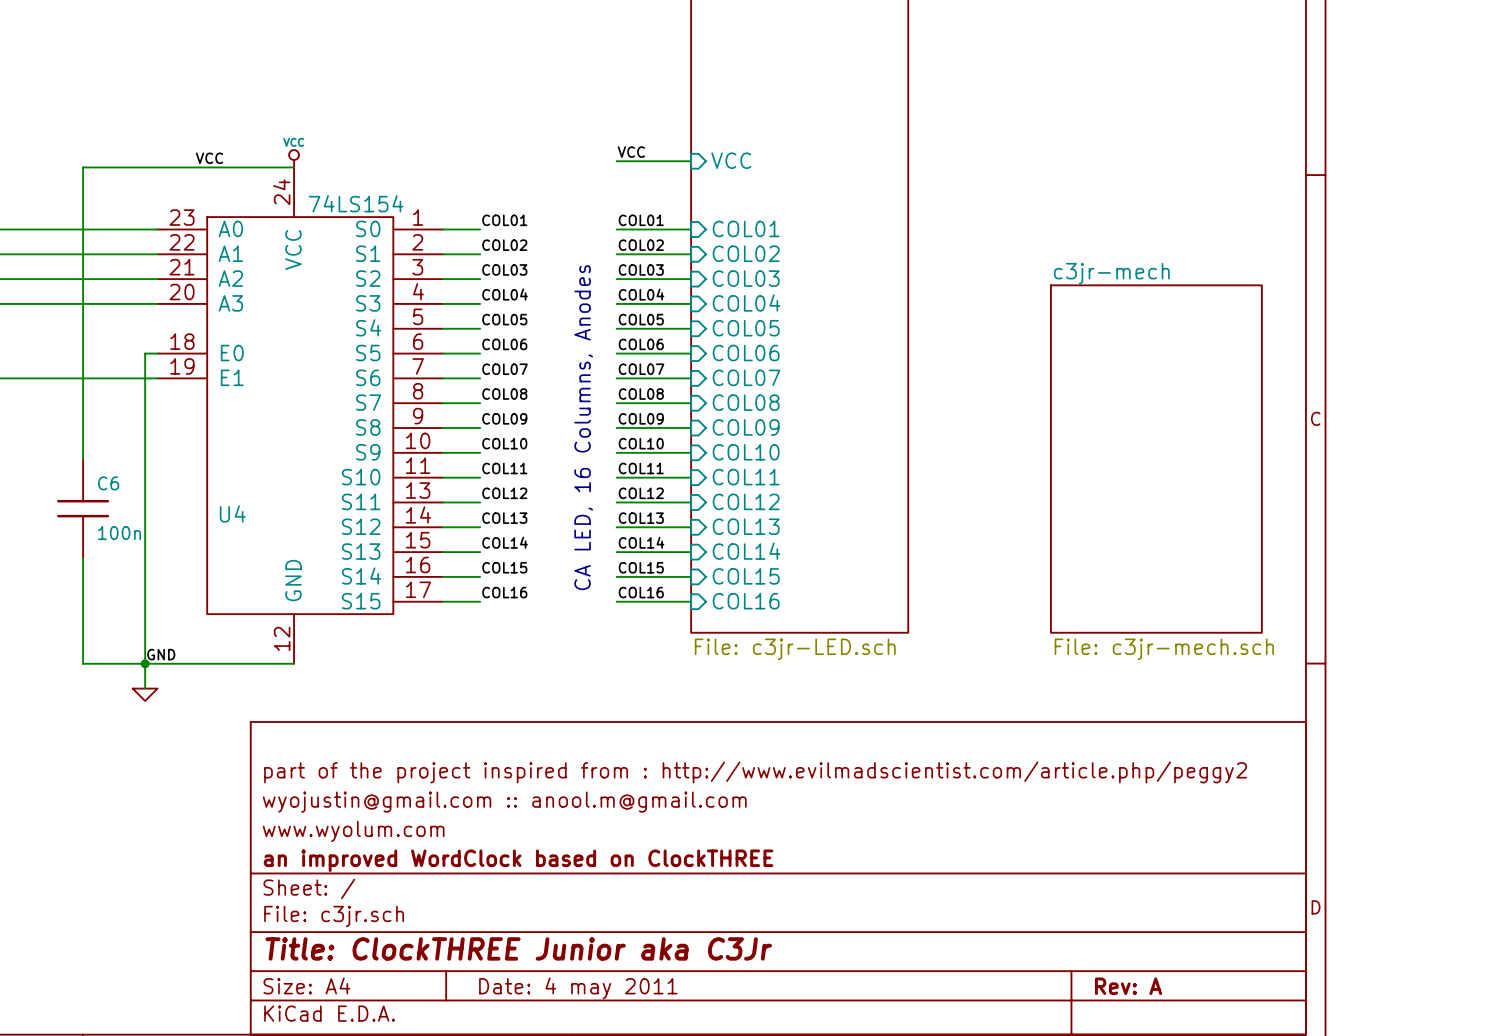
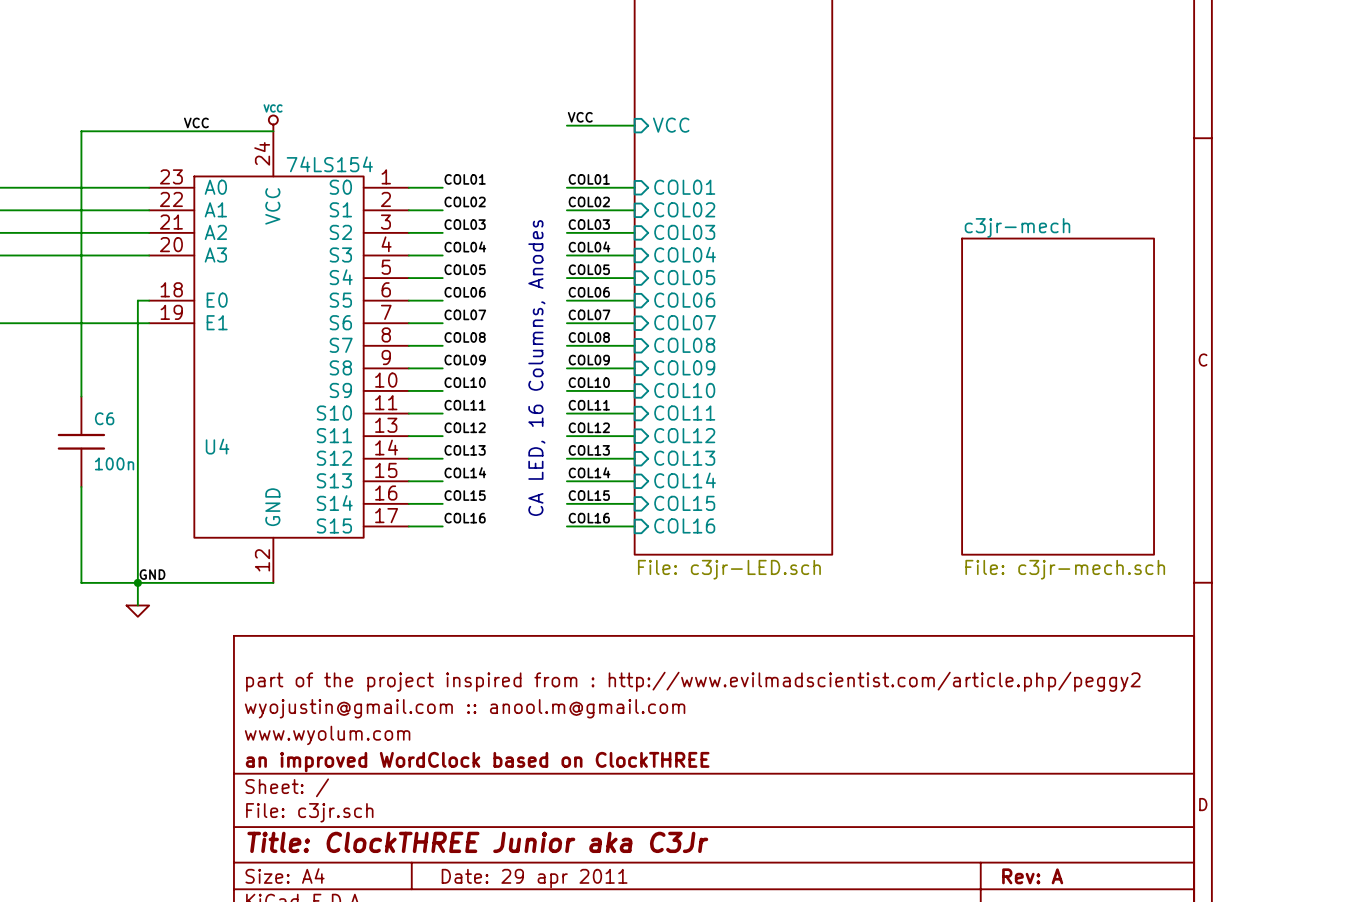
title block: Date: 4 may 2011 (578, 988) -> Date: 29 apr 2011 (534, 878)

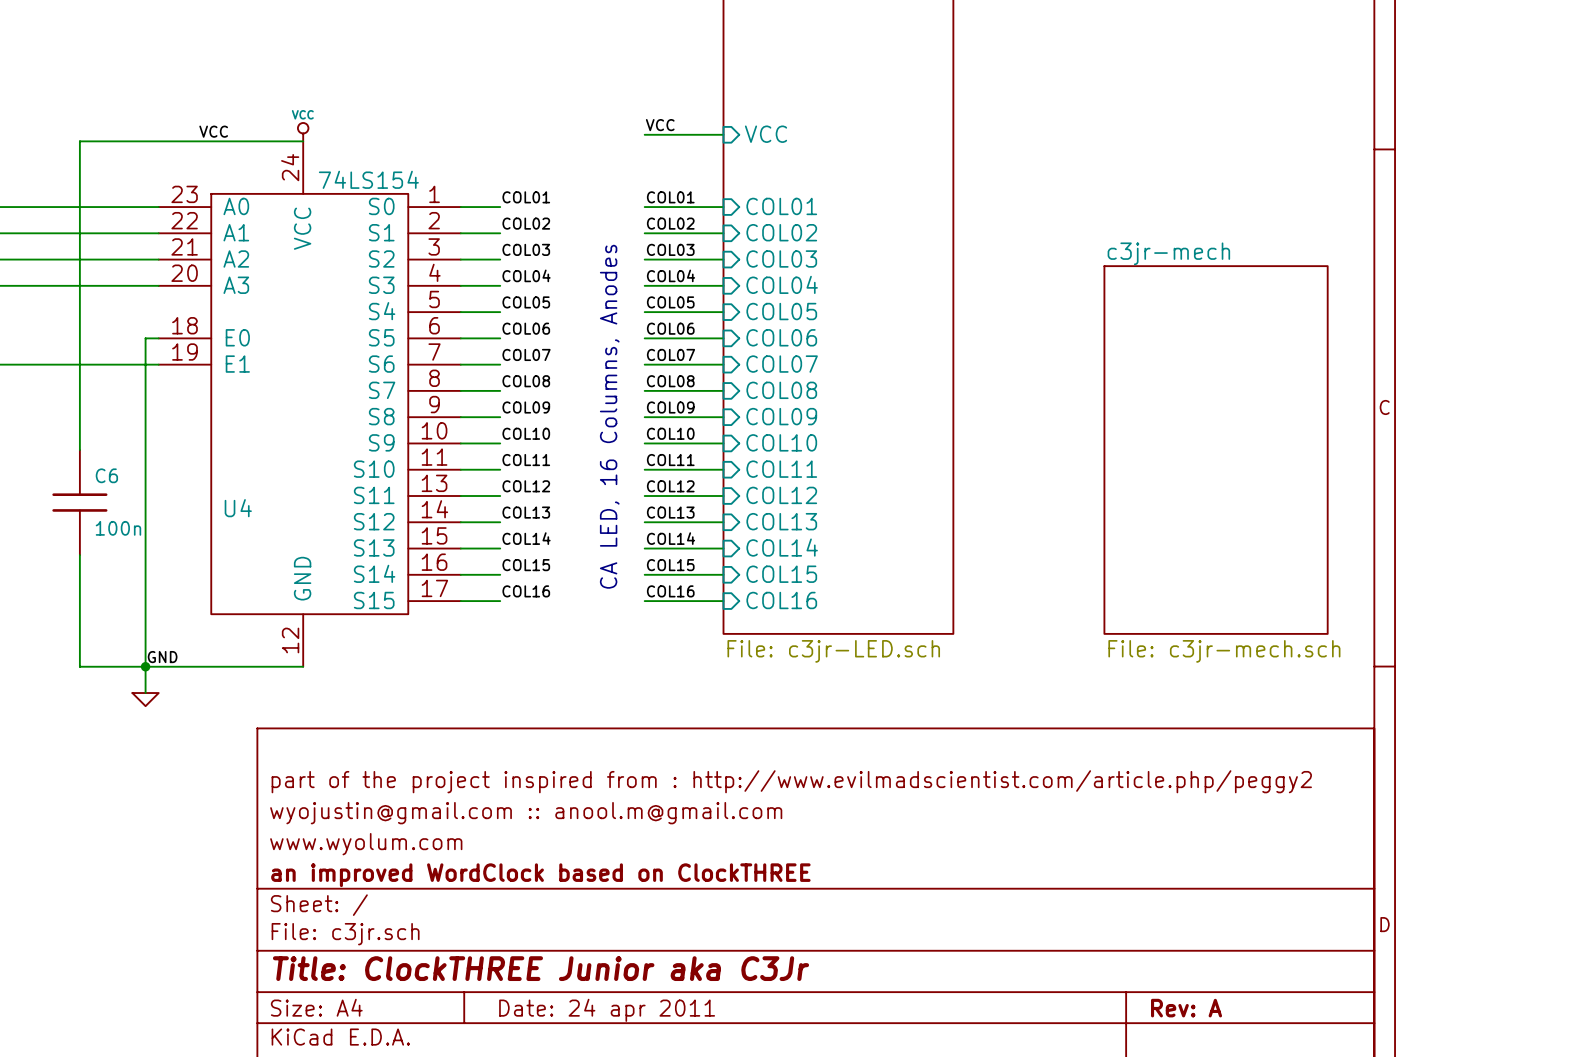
title block: Date: 29 apr 2011 (534, 878) -> Date: 24 apr 2011 (607, 1010)

